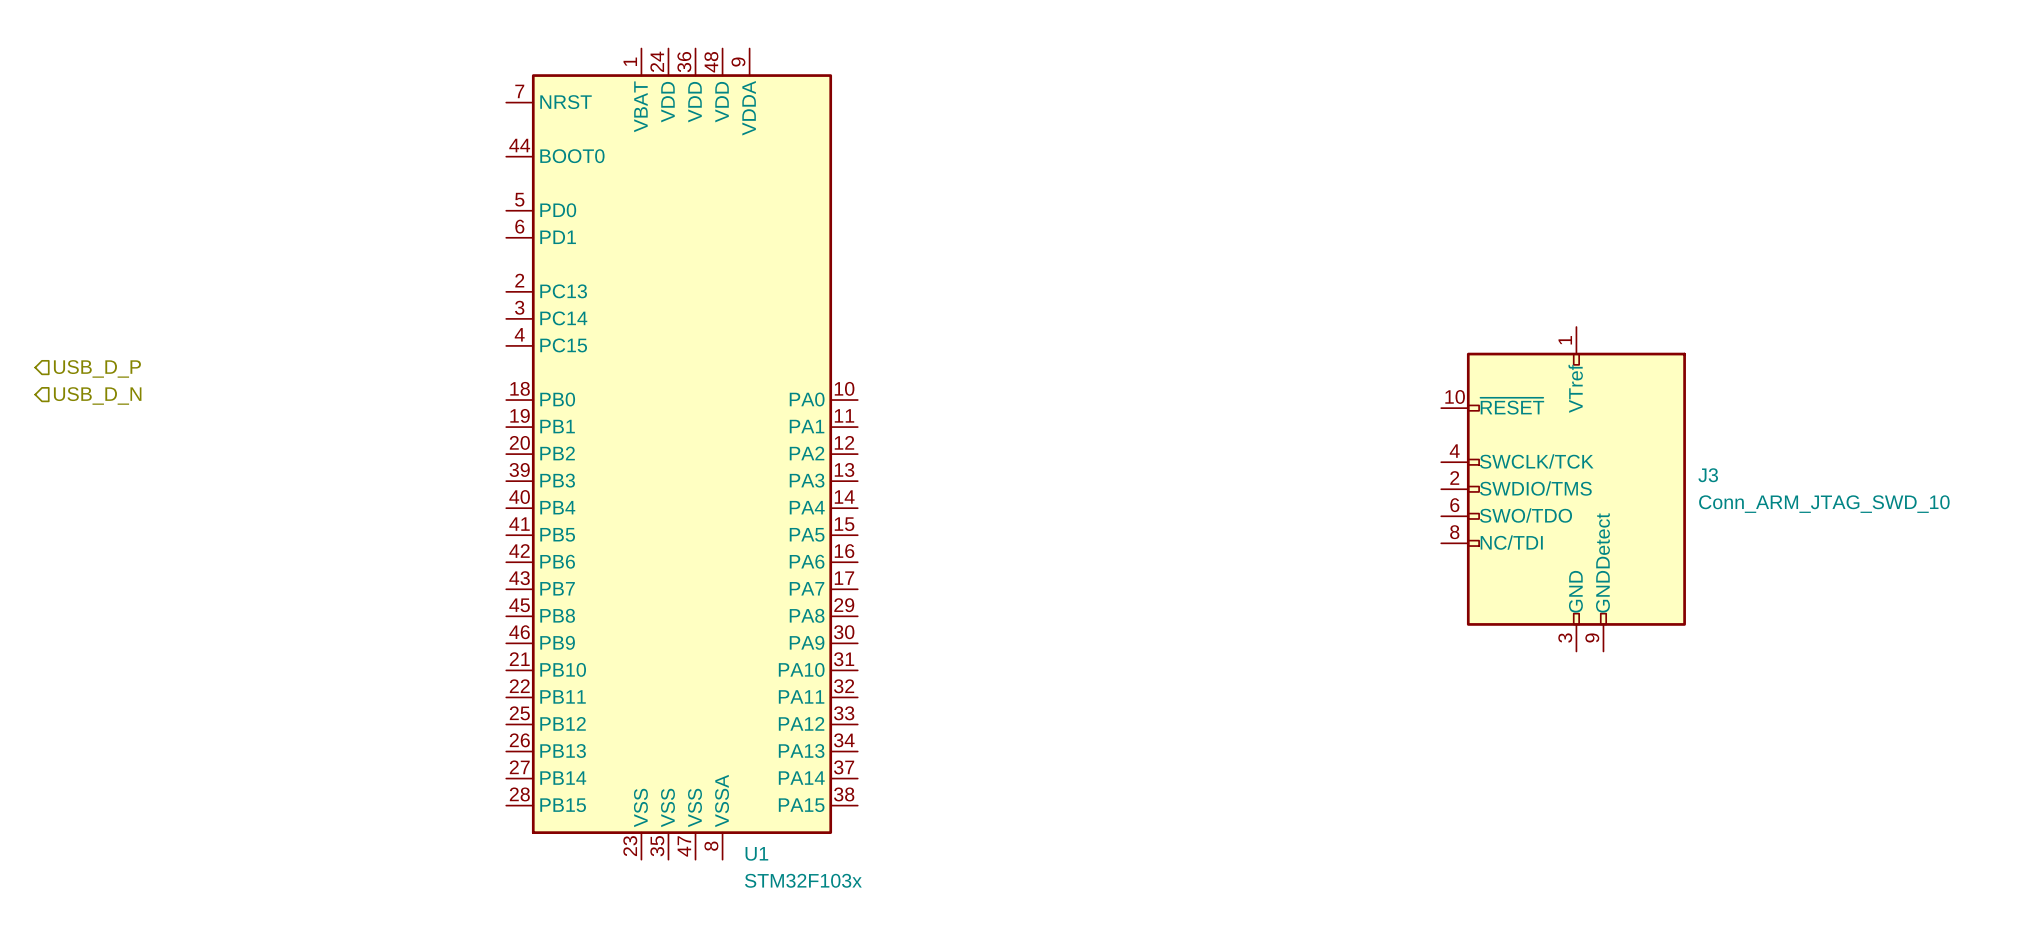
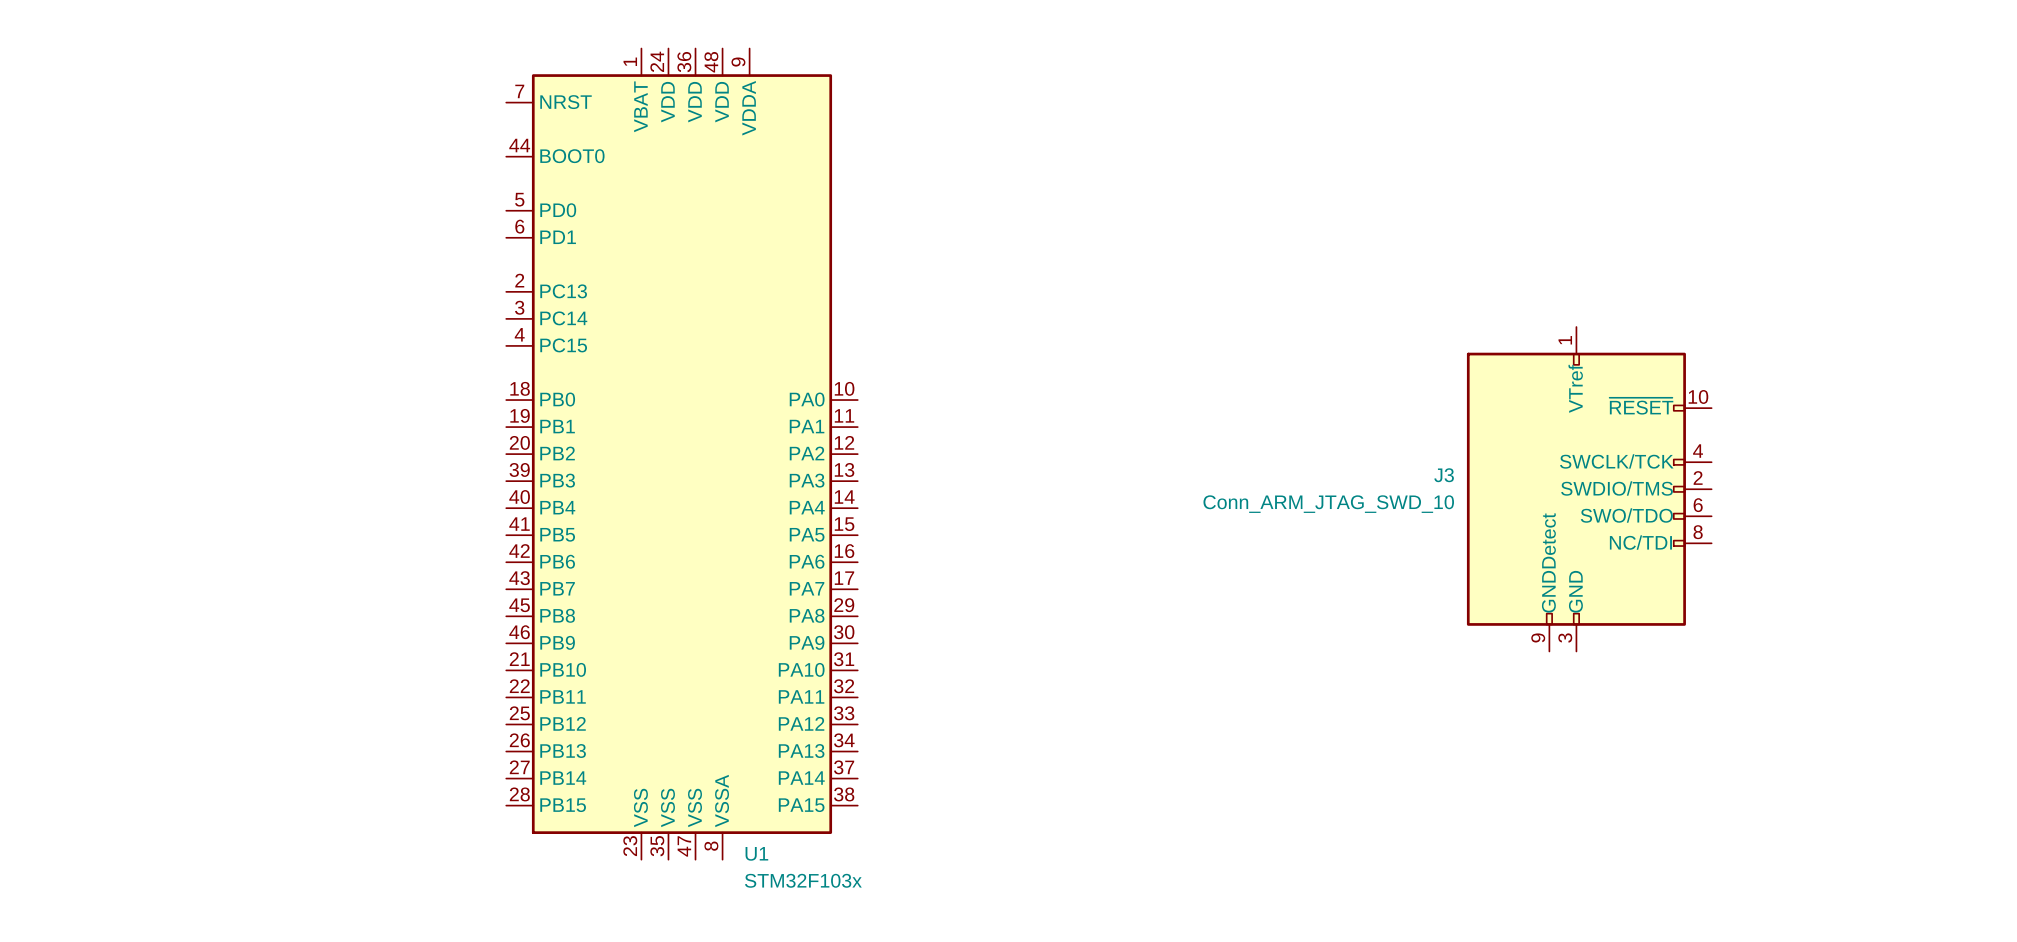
hierarchical label: USB_D_P (97, 368) -> none
hierarchical label: USB_D_N (97, 395) -> none
J3 flip: as is (1576, 489) -> left-right (1576, 489)

